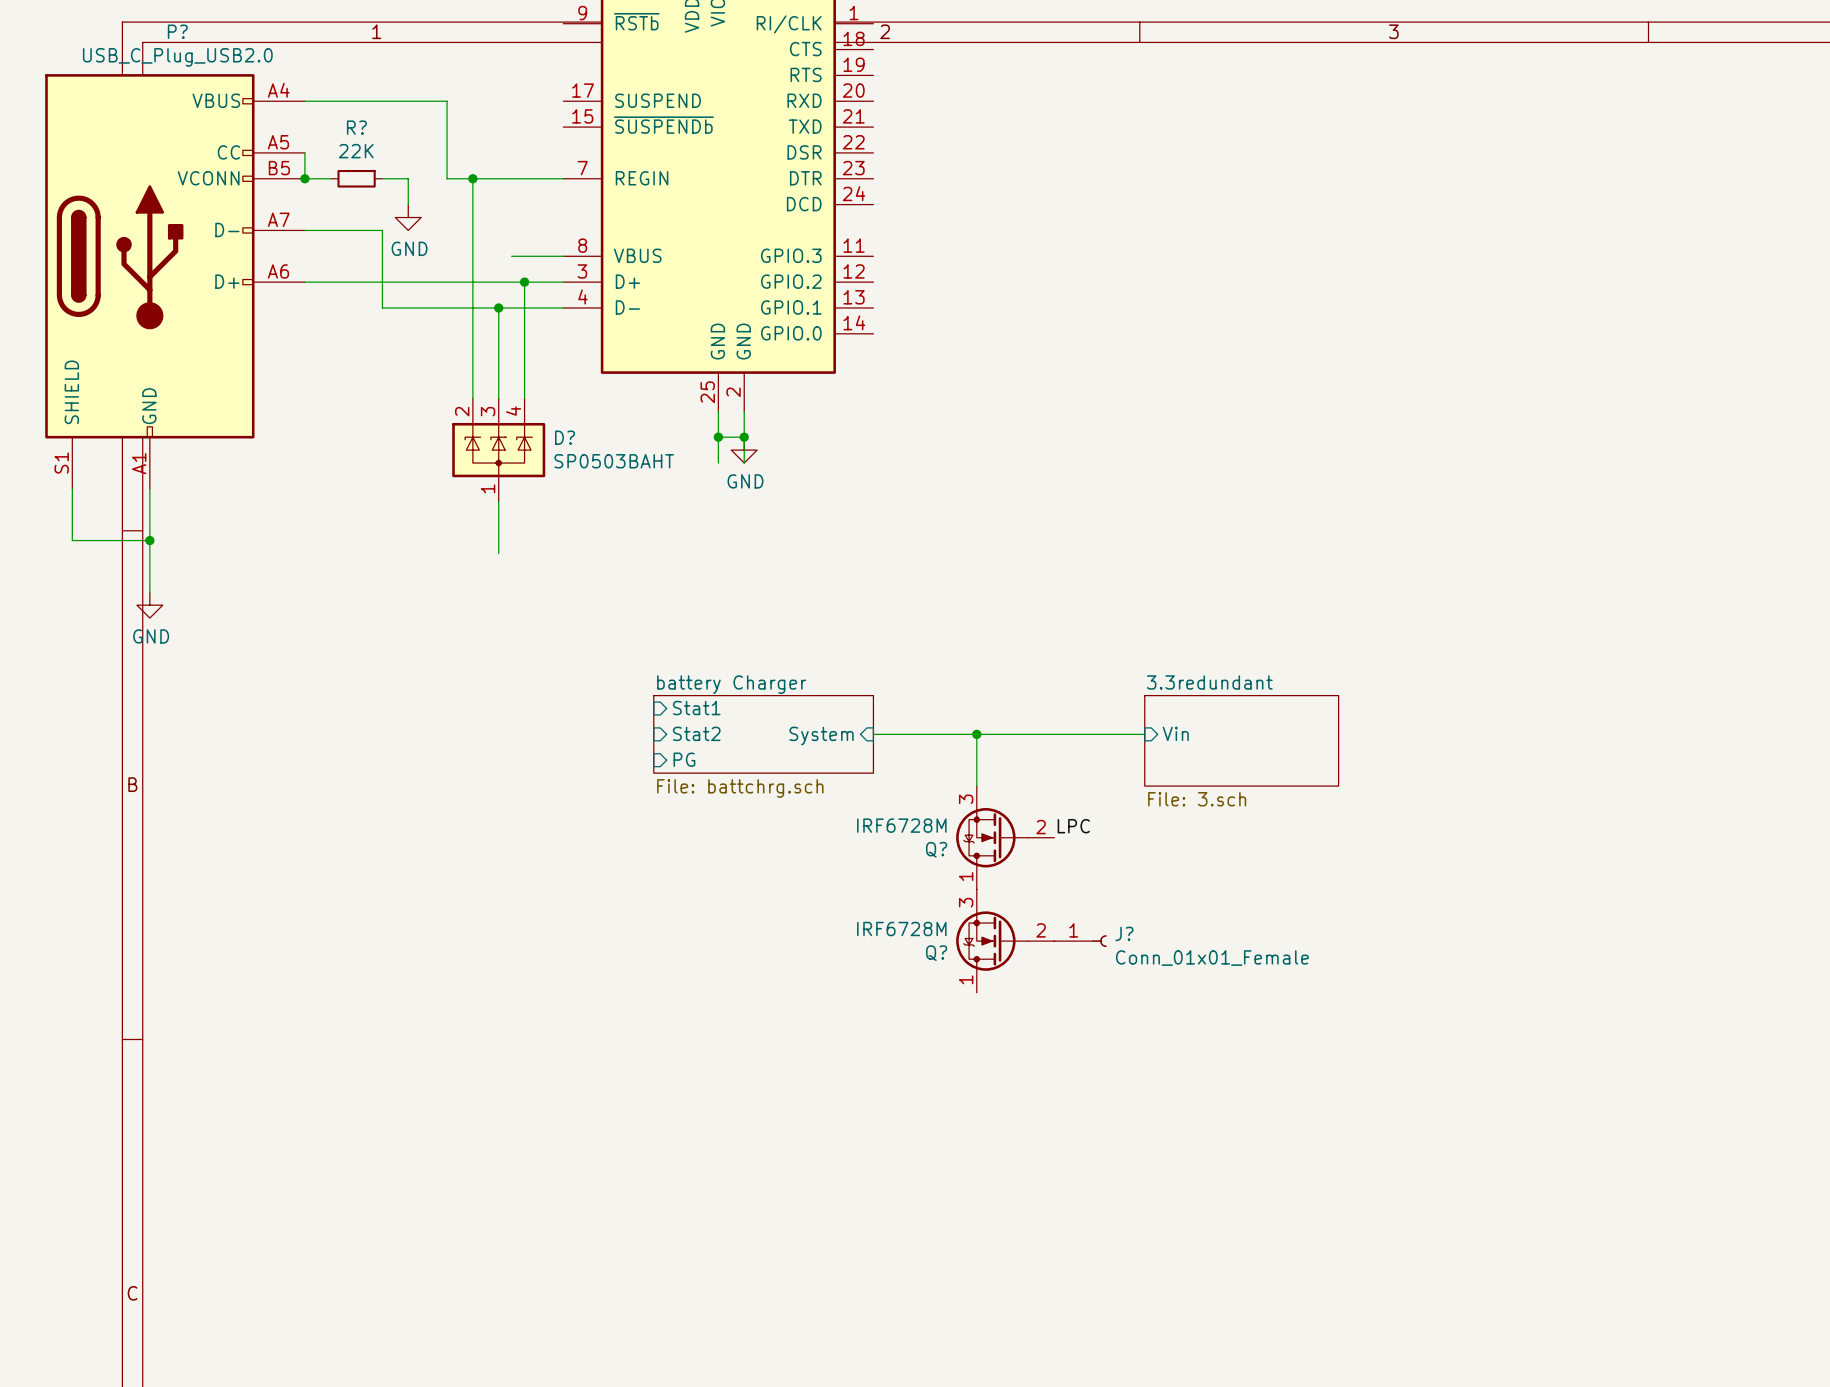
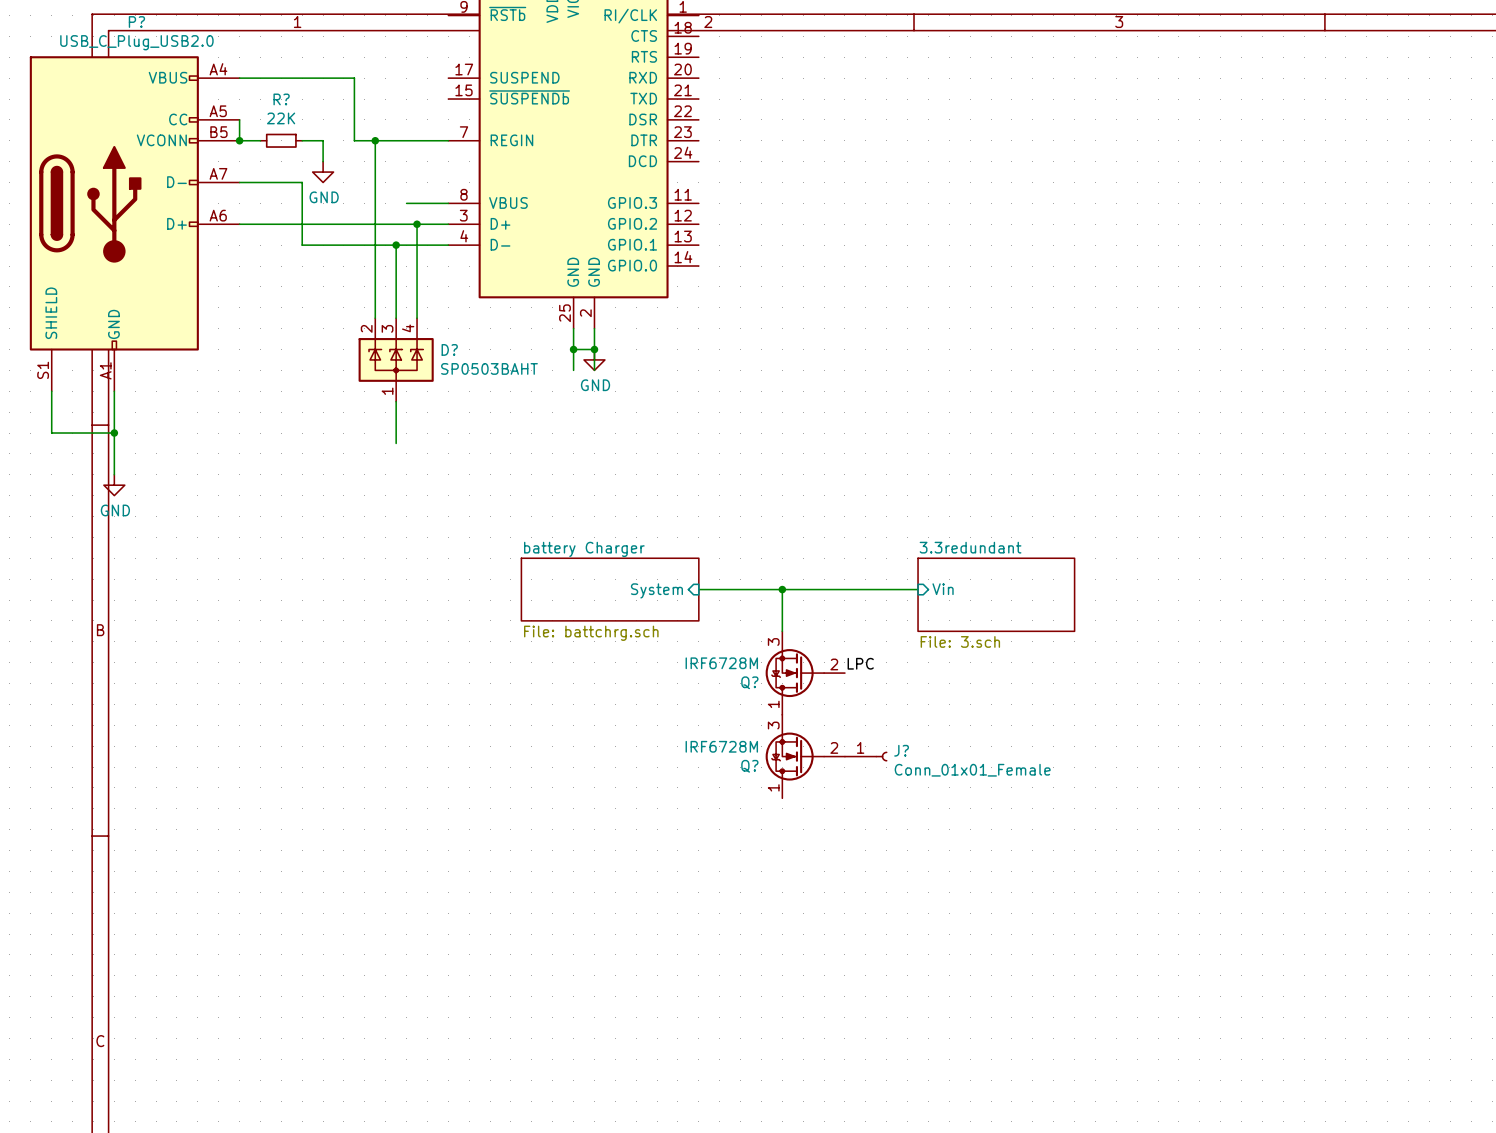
sheet pin: Stat1 (696, 708) -> none
sheet pin: Stat2 (696, 733) -> none
sheet pin: PG (684, 759) -> none

